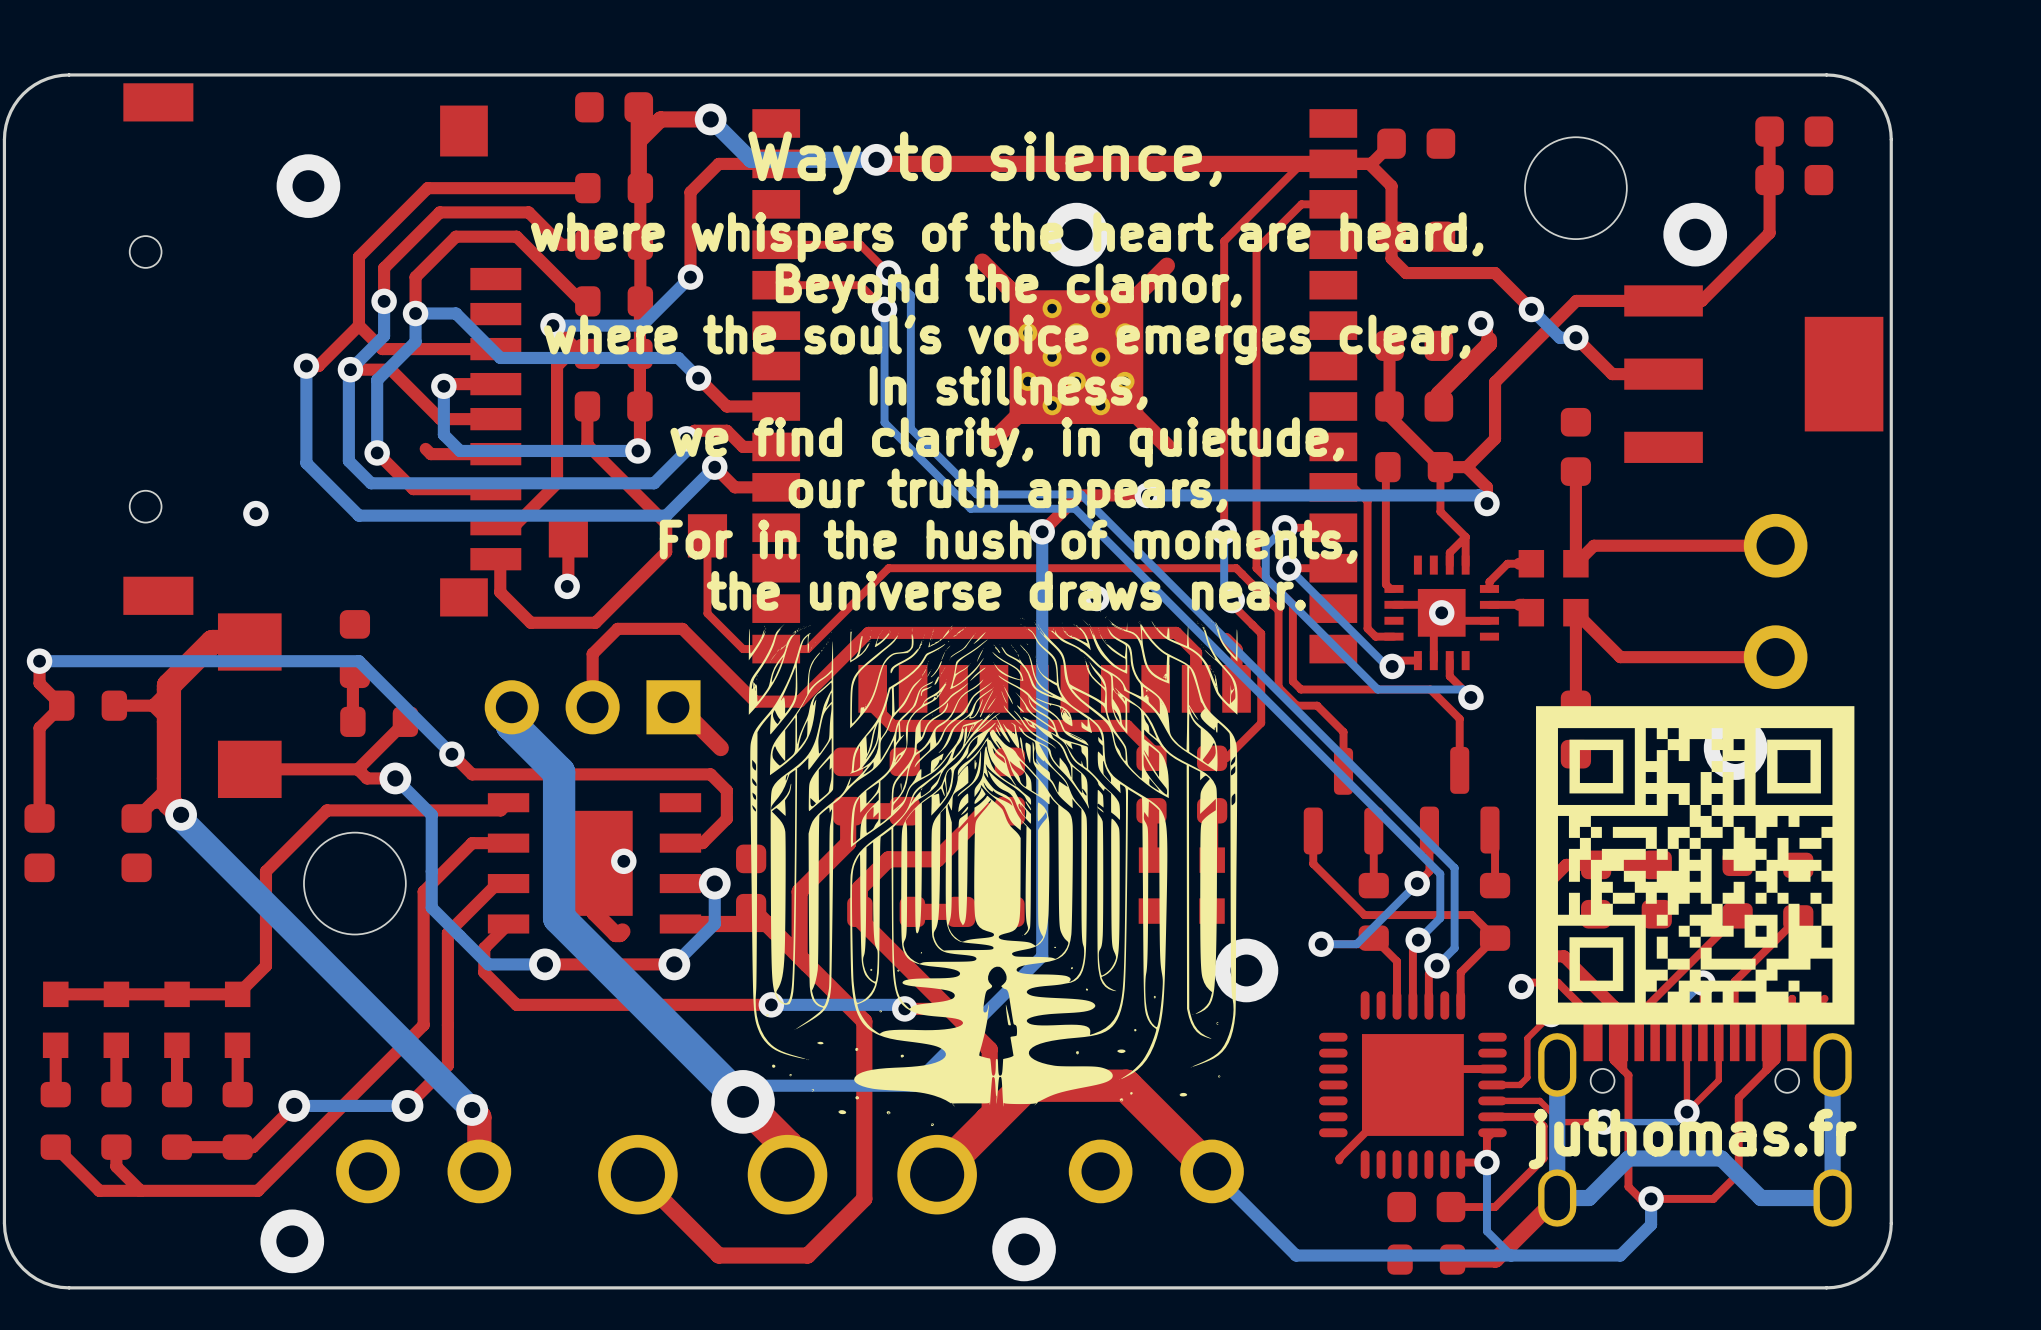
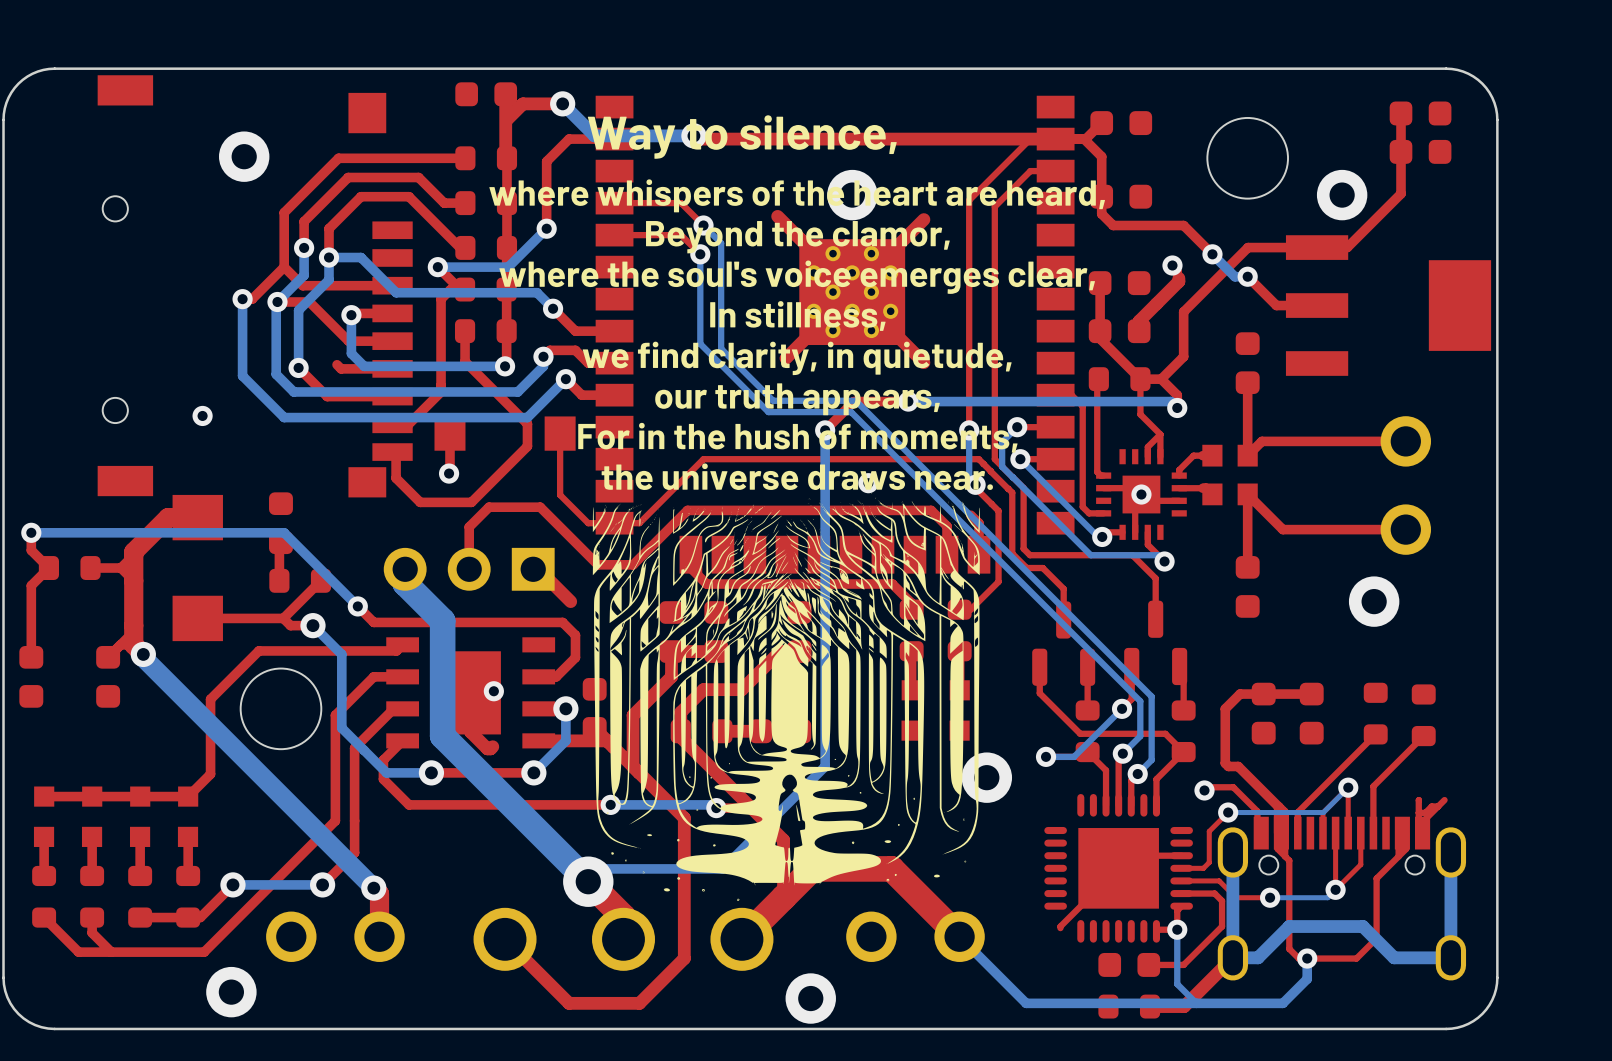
drawing: [1536, 706, 1855, 1025] -> none
text: juthomas.fr (1692, 1139) -> none

